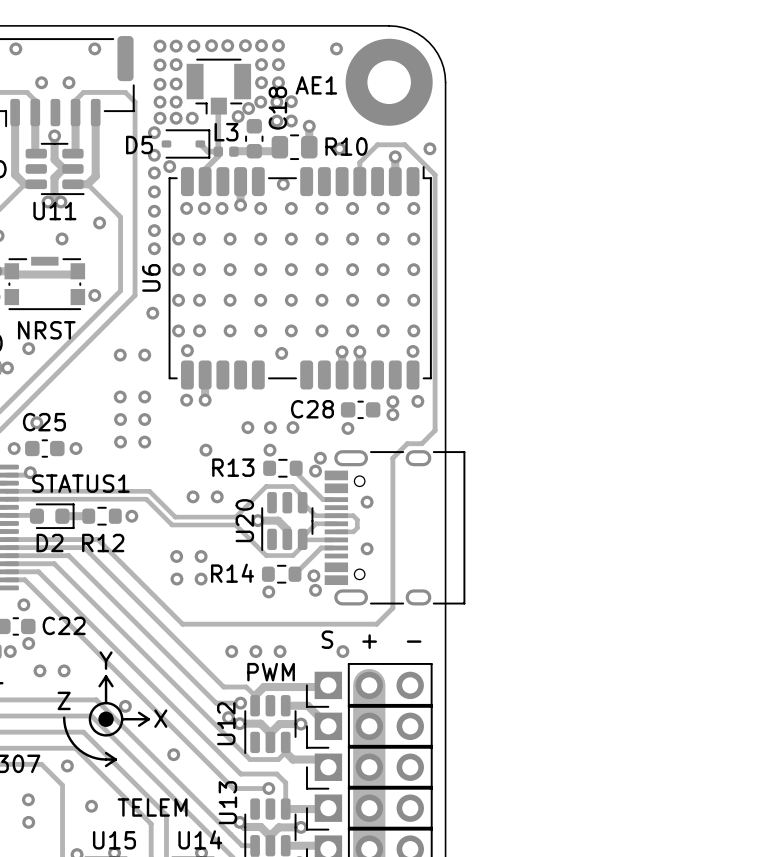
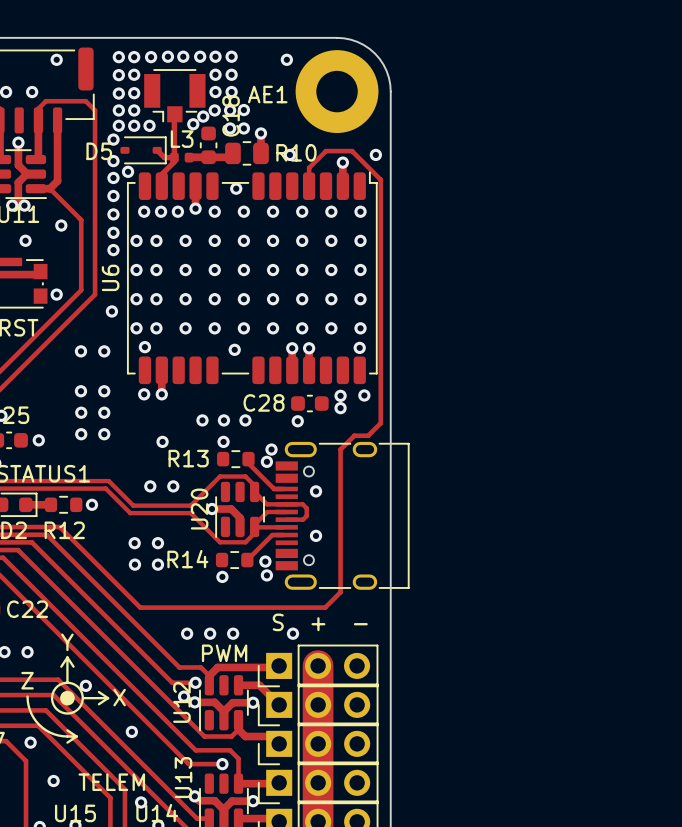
via: none -> (141, 802)

